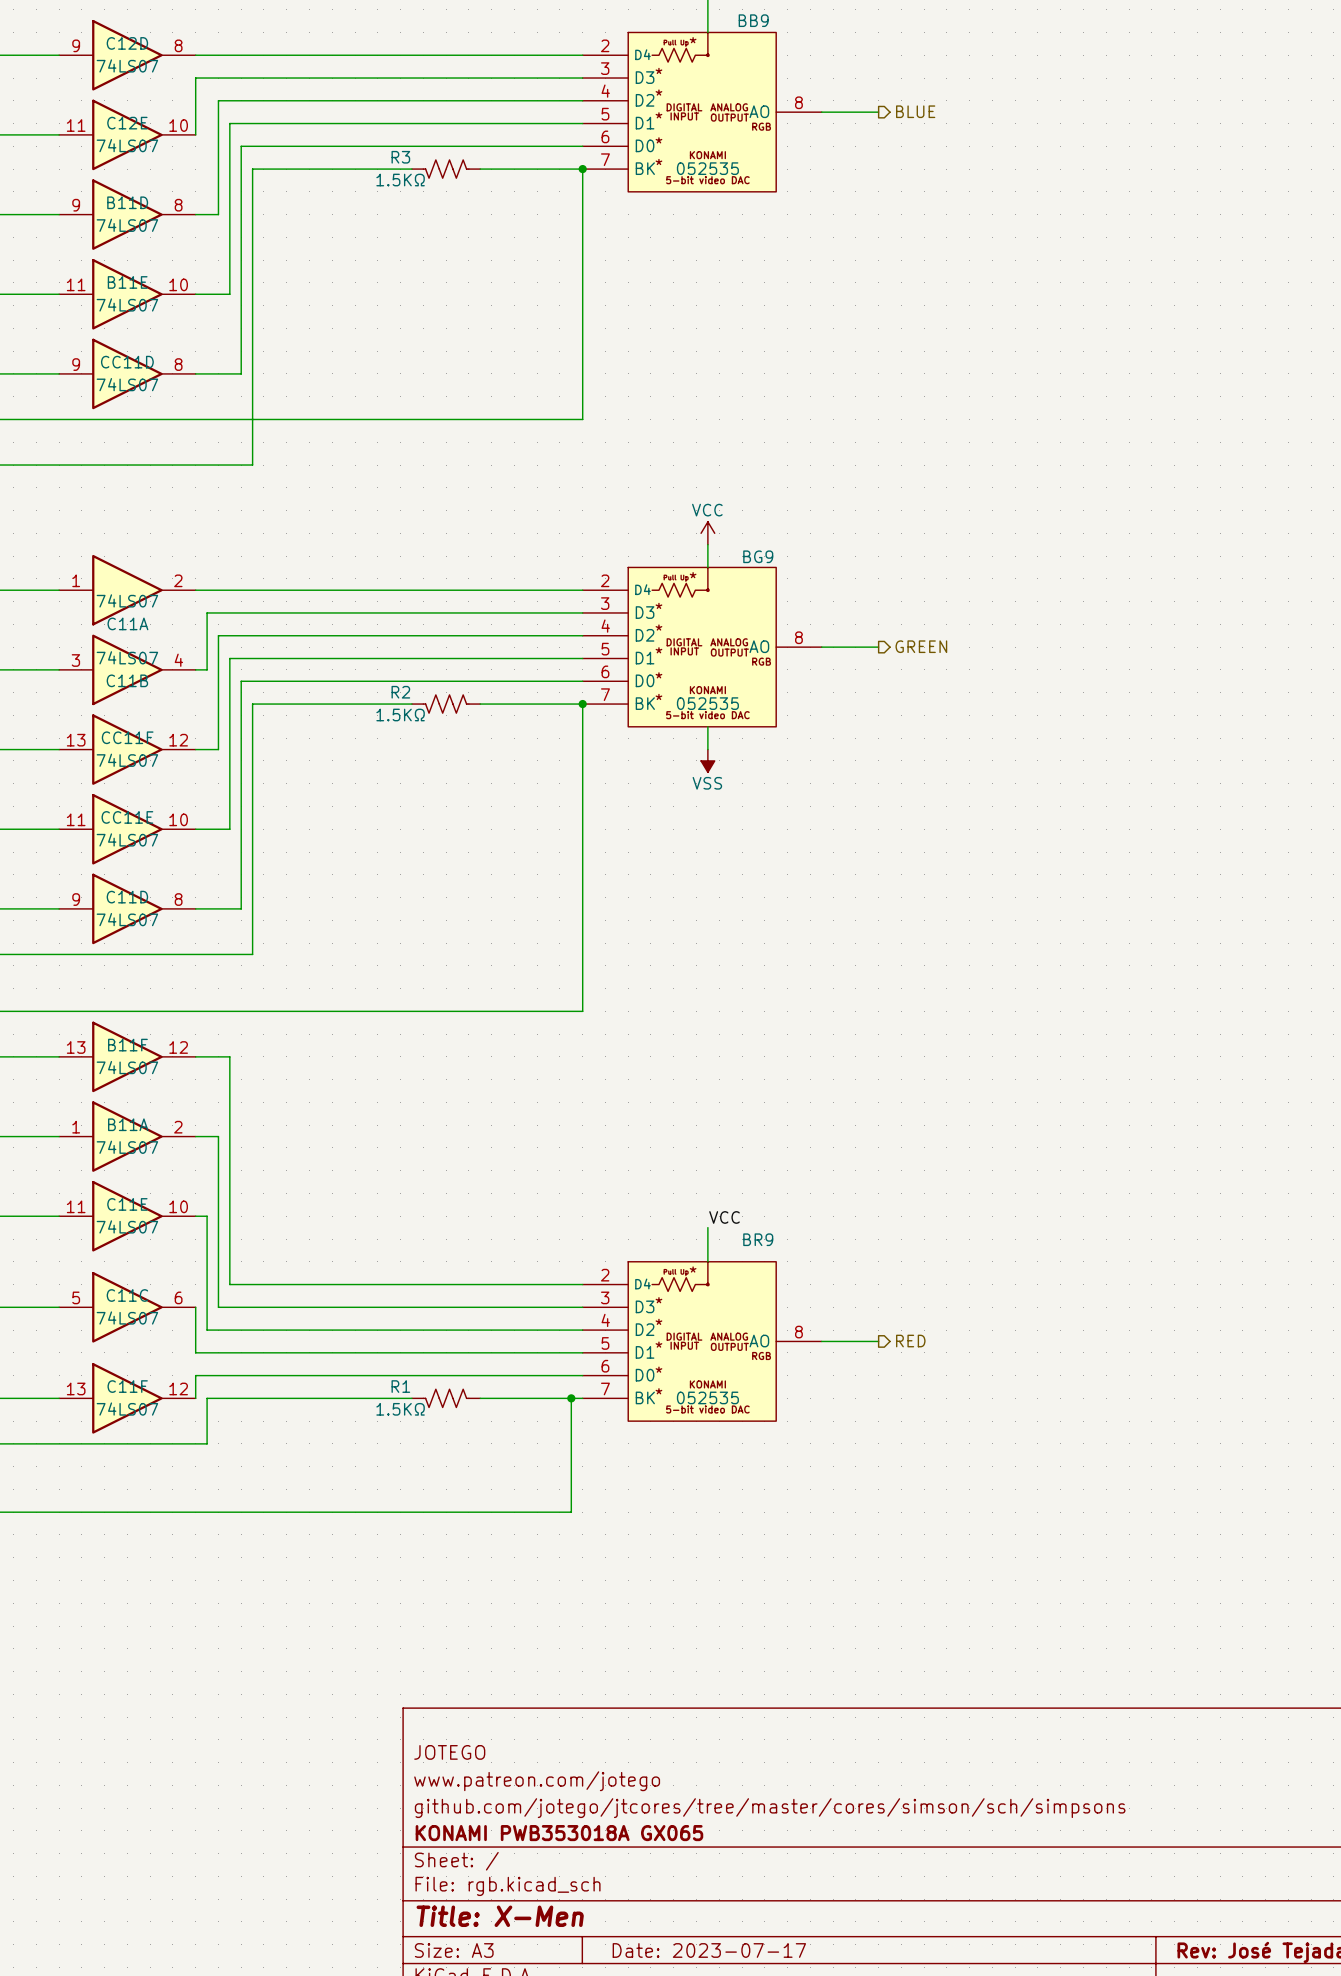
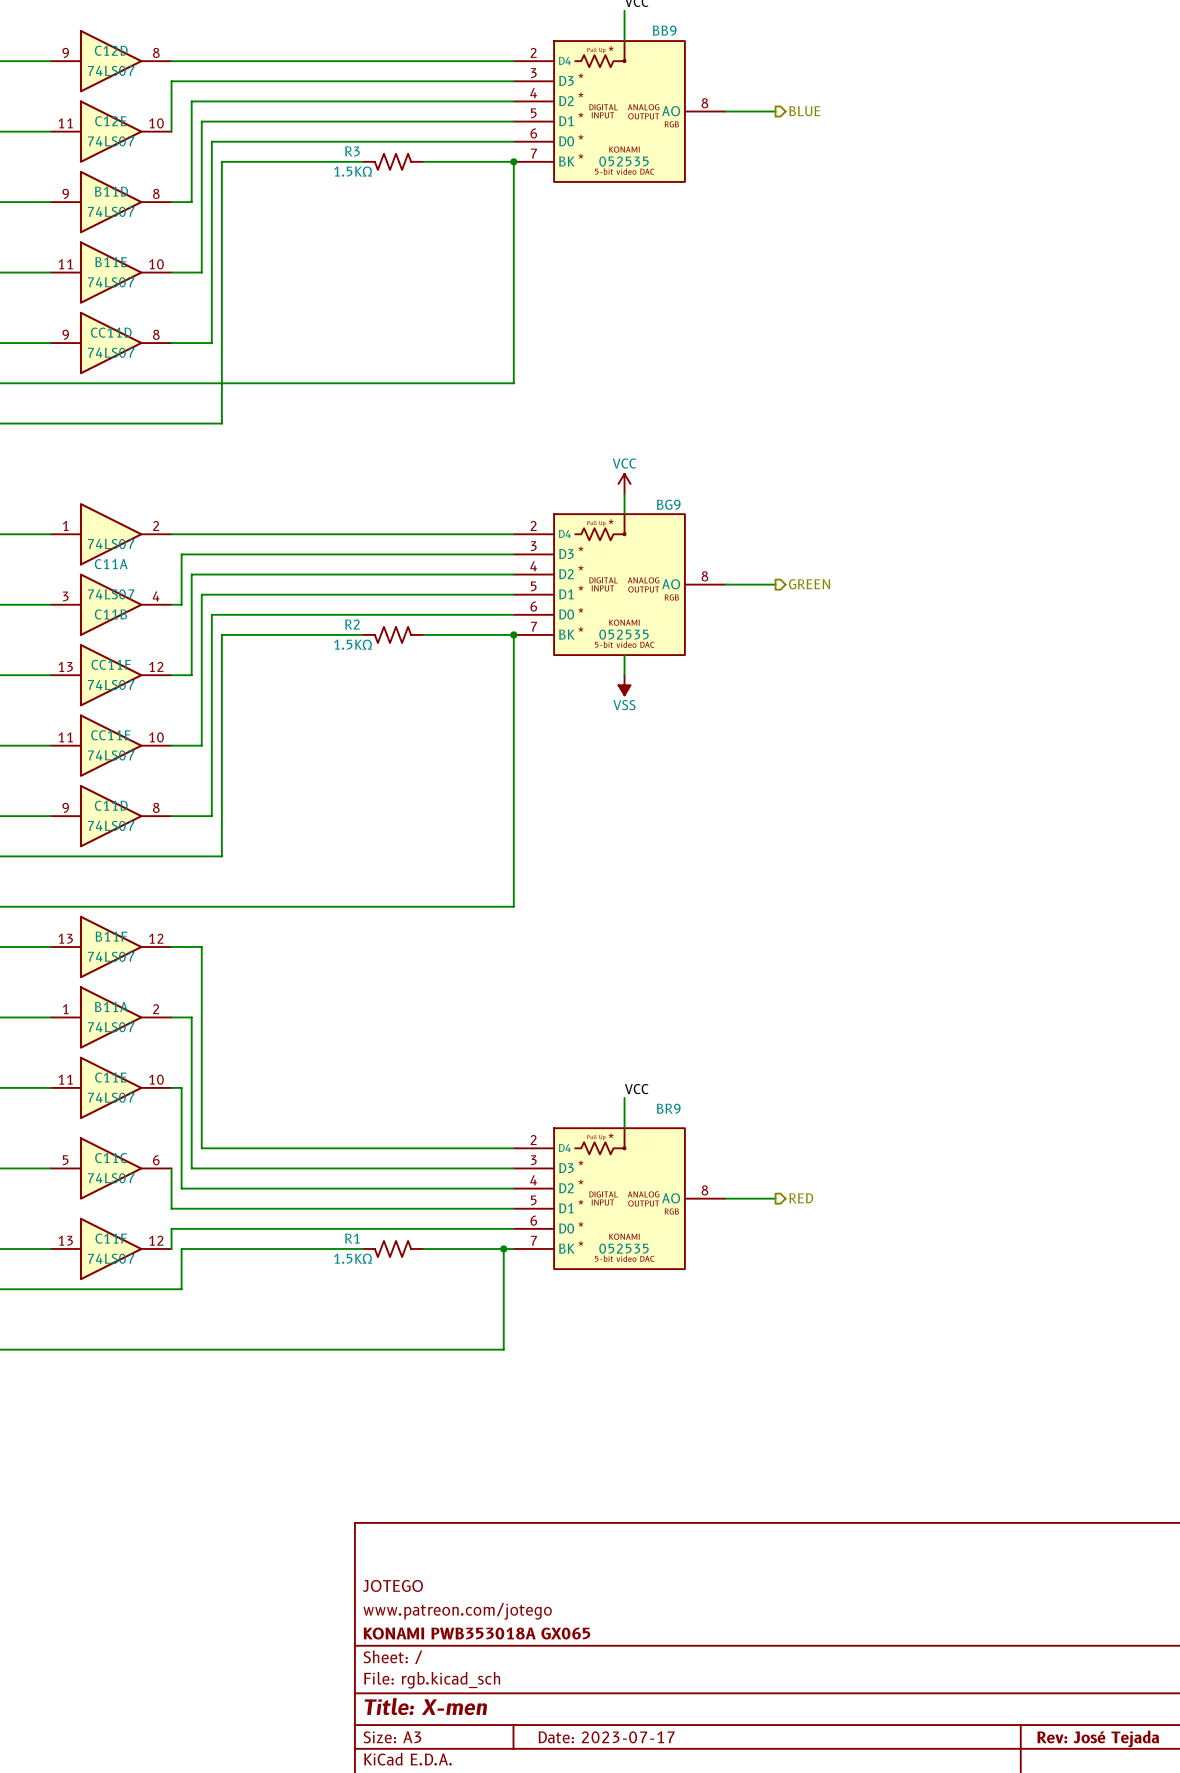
title block: JOTEGO (449, 1752) -> none
title block: www.patreon.com/jotego (537, 1781) -> JOTEGO (392, 1585)
title block: github.com/jotego/jtcores/tree/master/cores/simson/sch/simpsons (770, 1808) -> www.patreon.com/jotego (457, 1611)
title block: Title: X-Men (500, 1916) -> Title: X-men (425, 1706)

